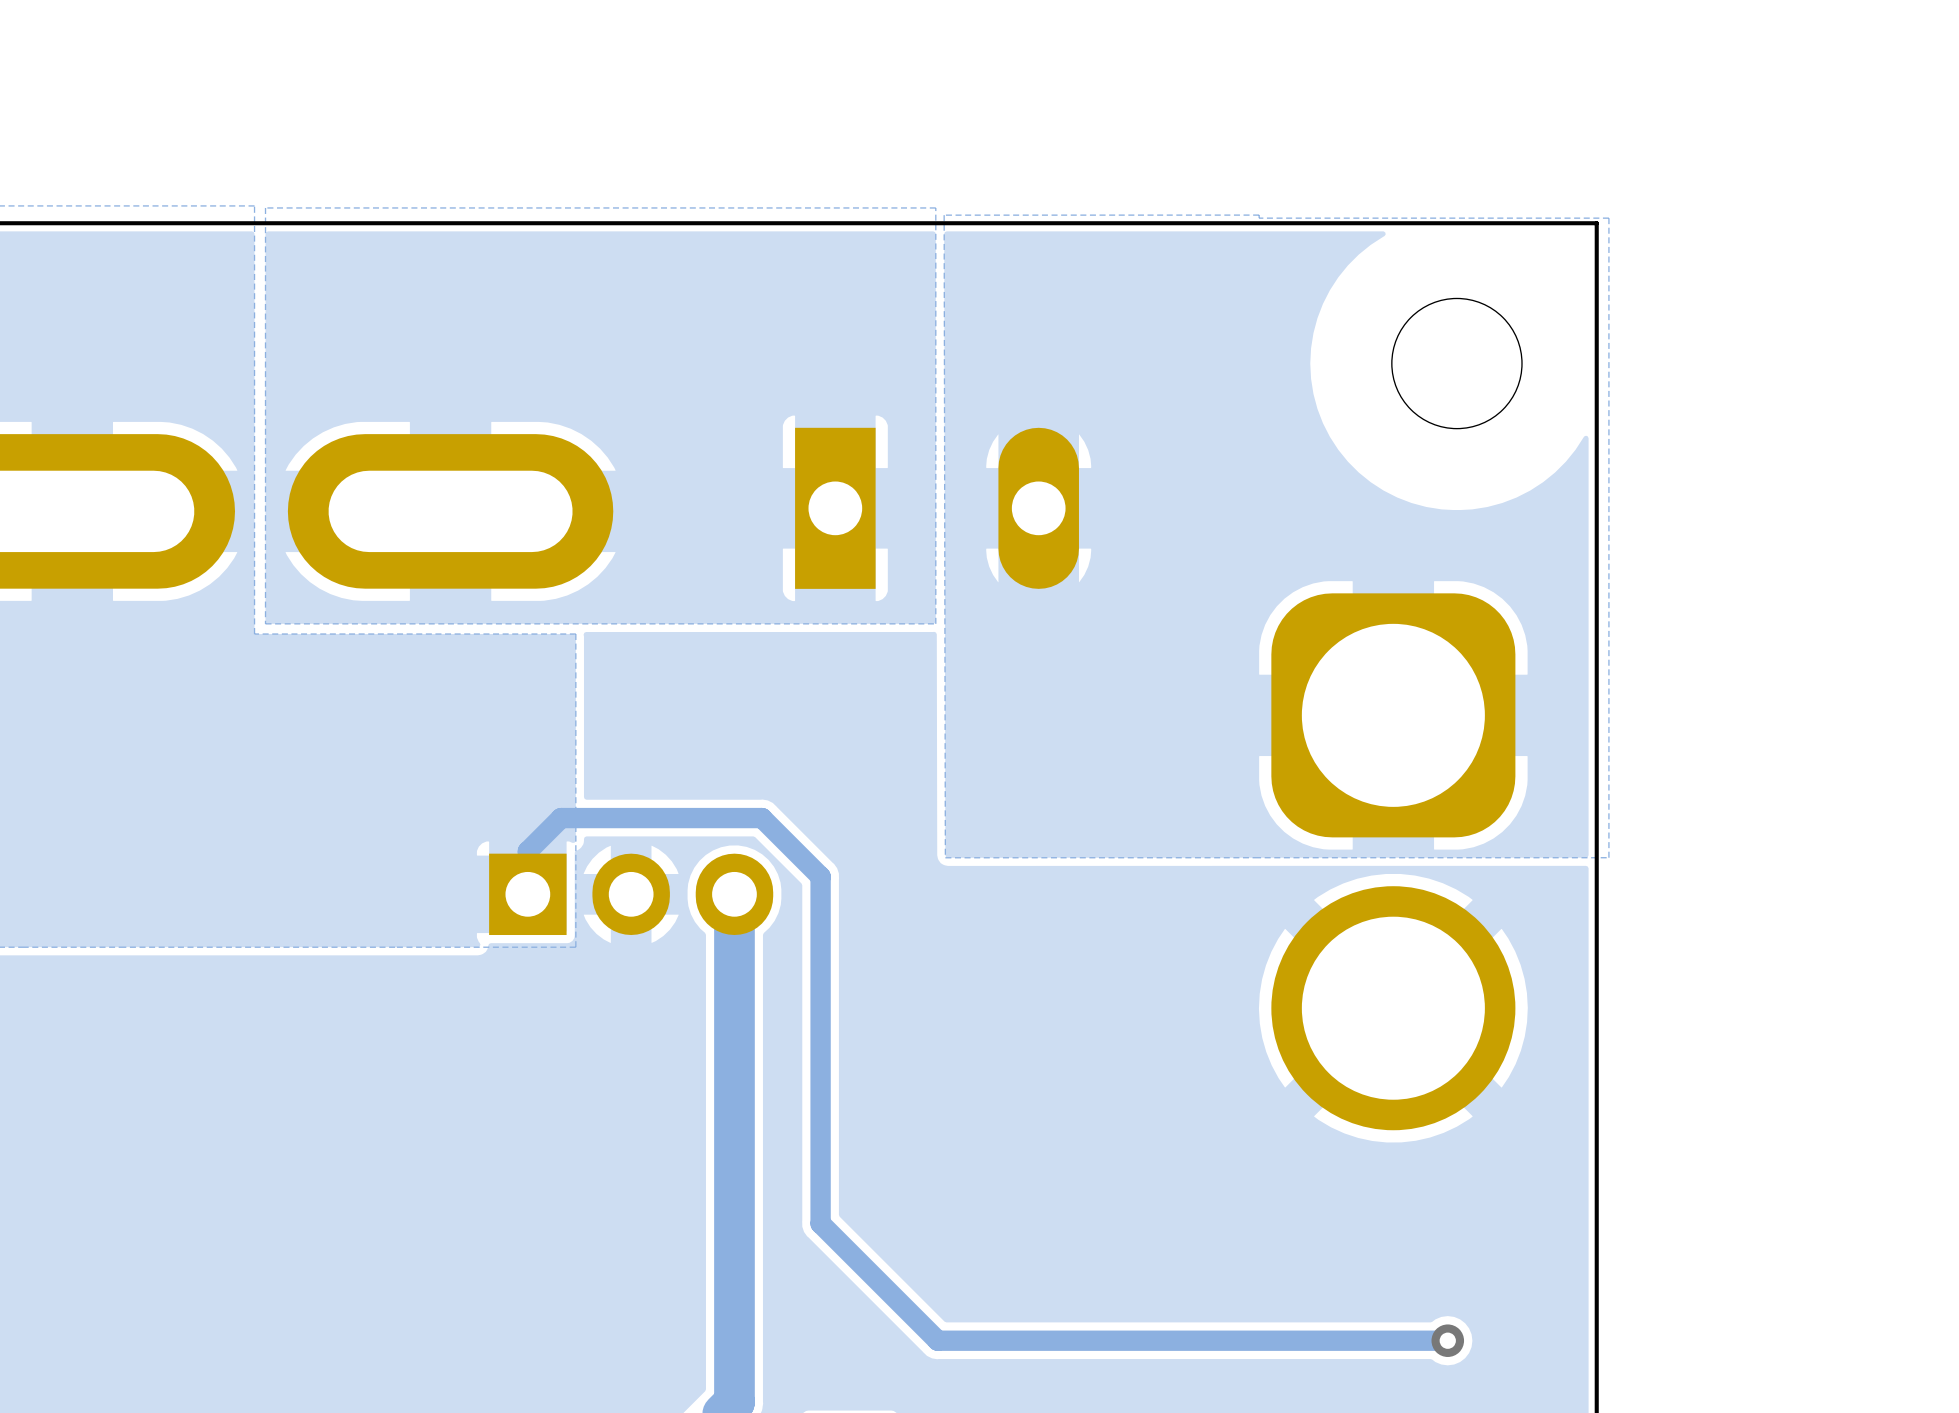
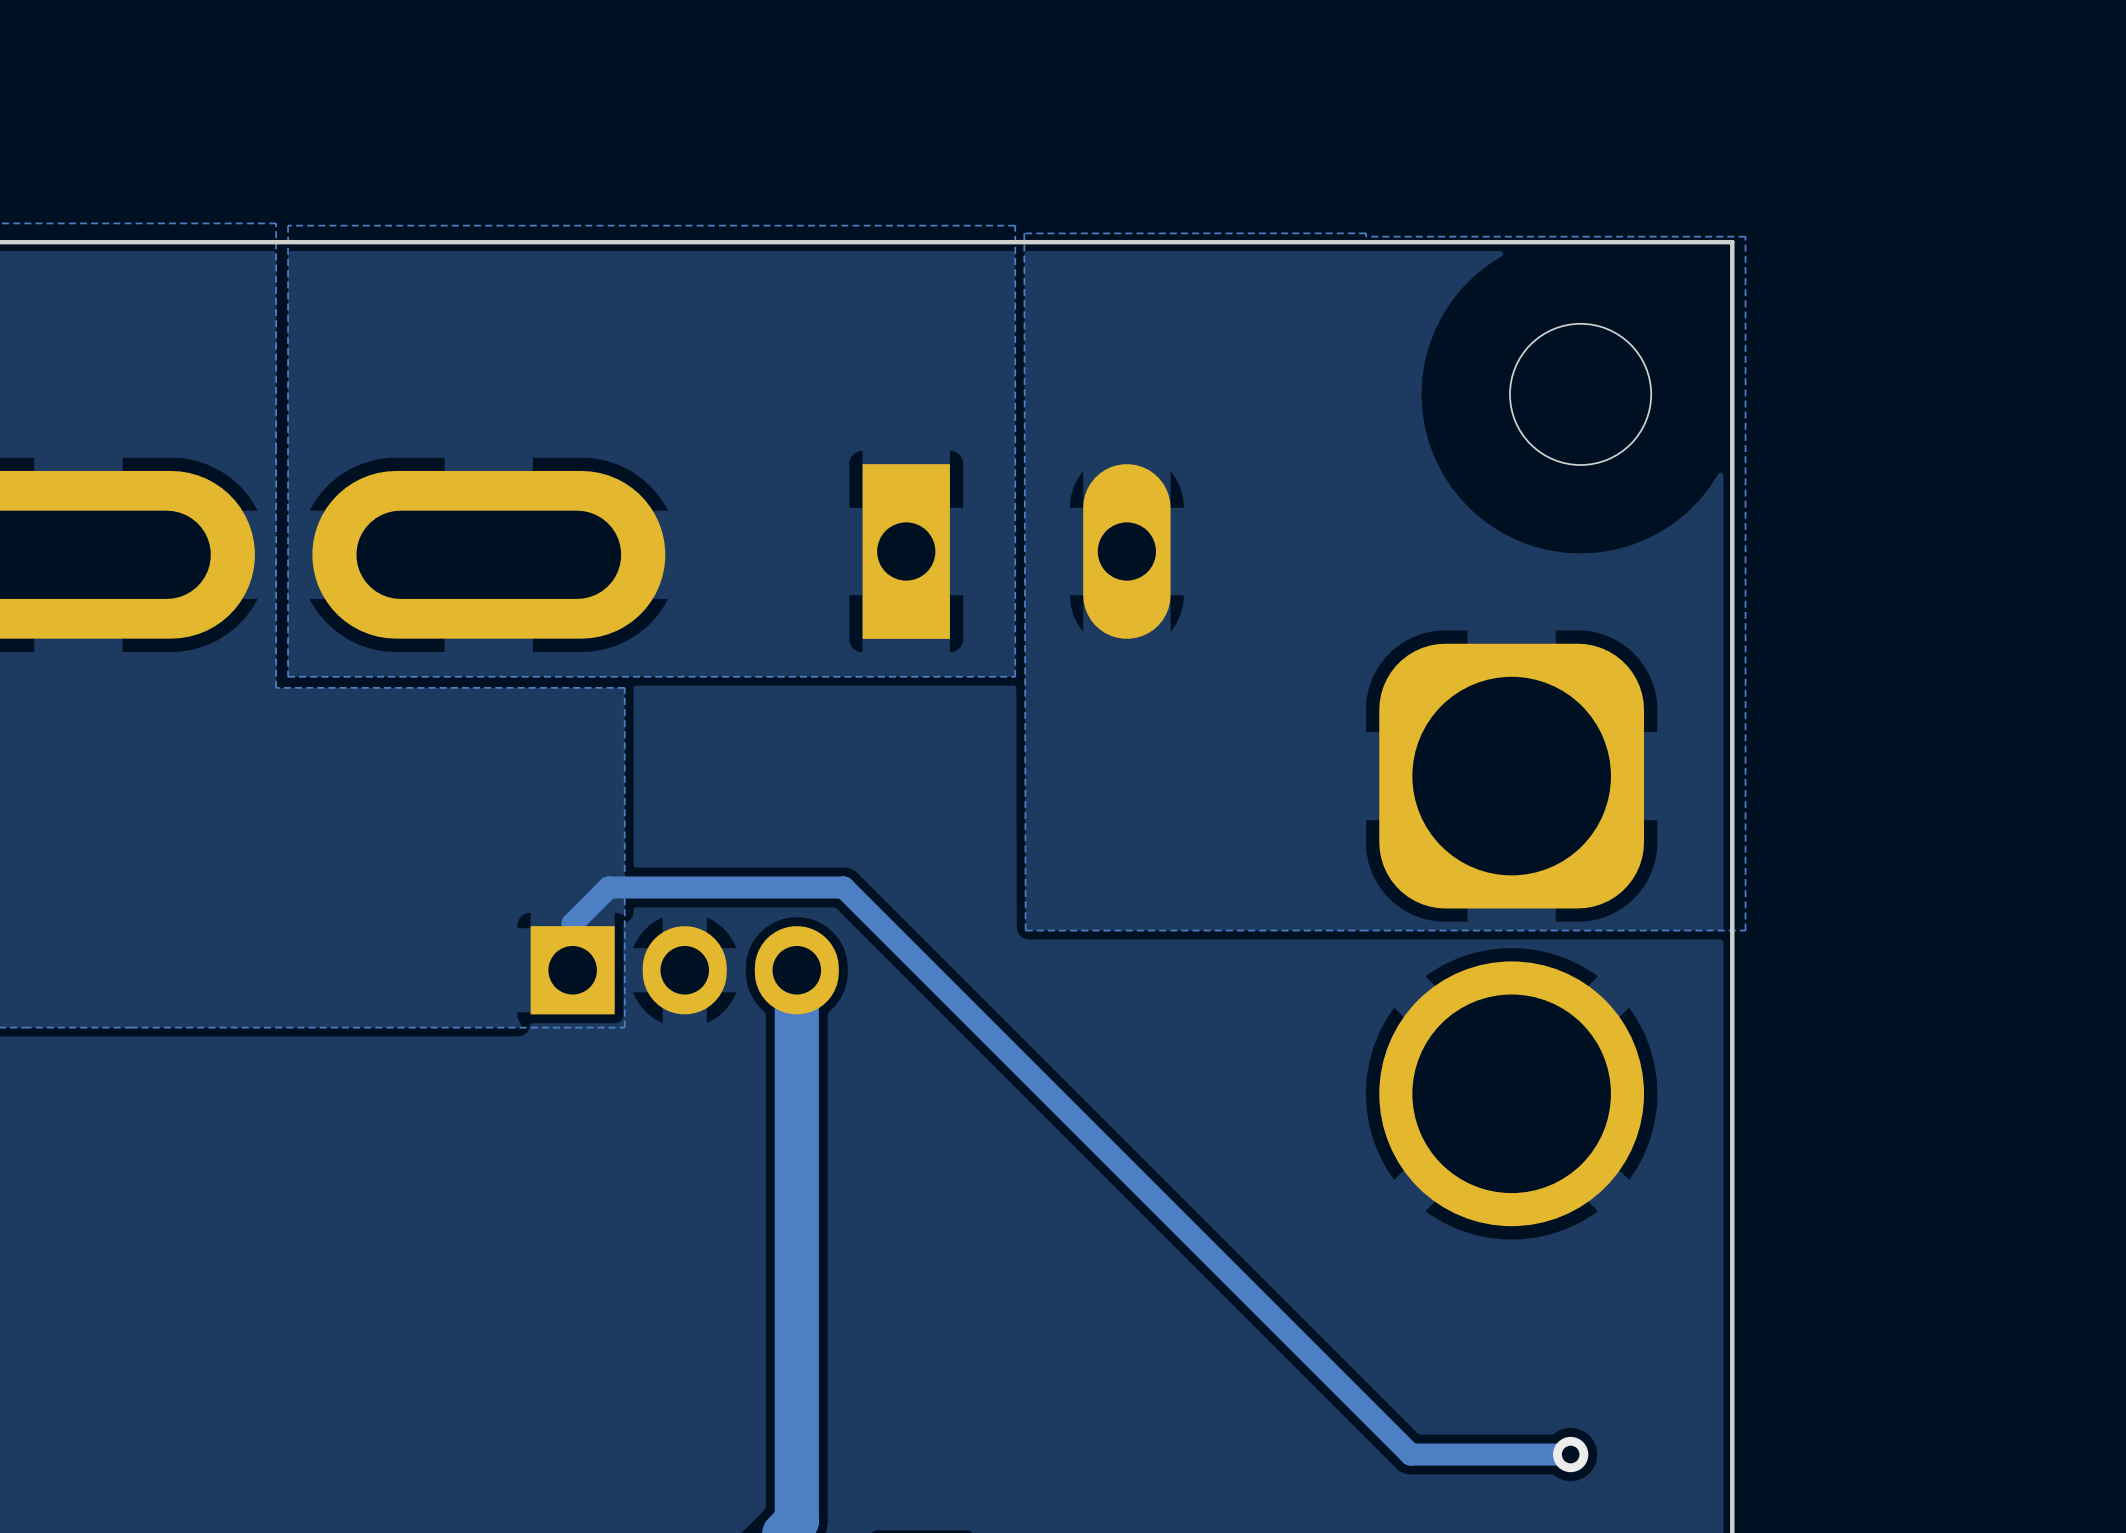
track: (762, 818) (820, 876) (820, 1223) (937, 1340) (1300, 1340) -> (826, 887) (843, 887) (1410, 1454)

